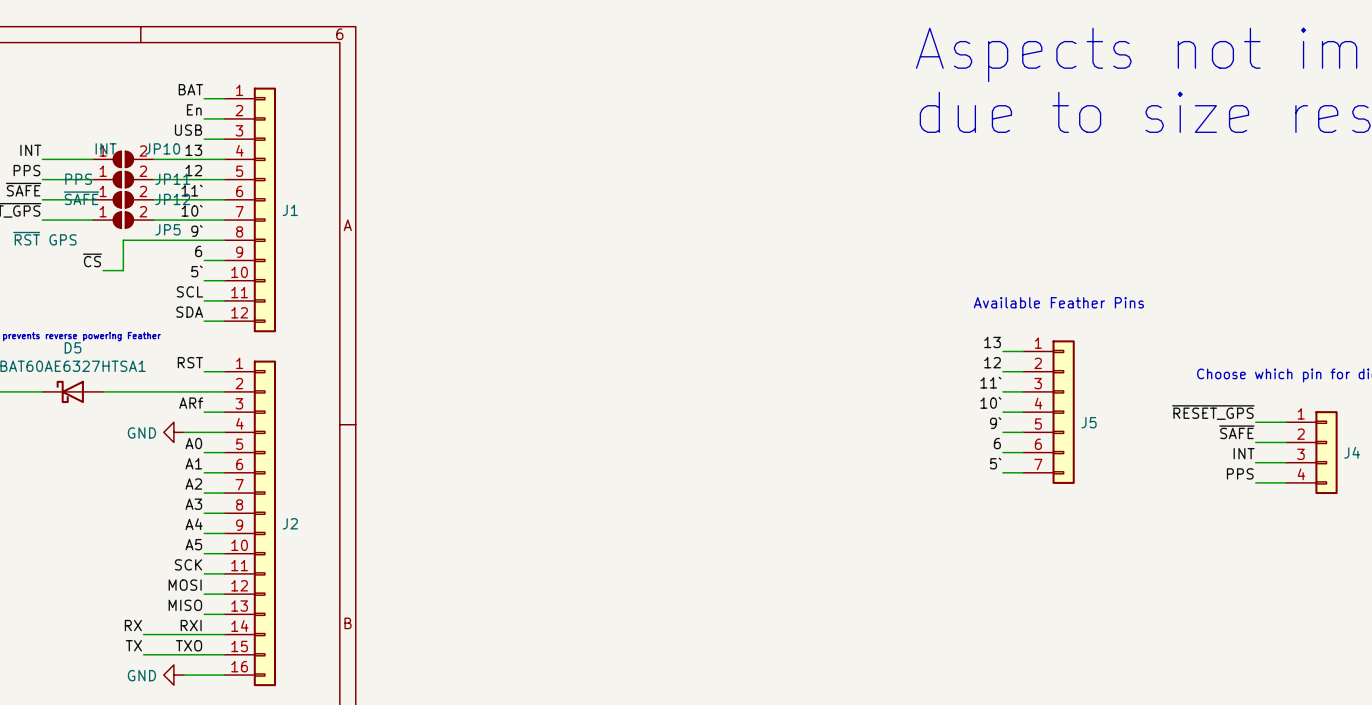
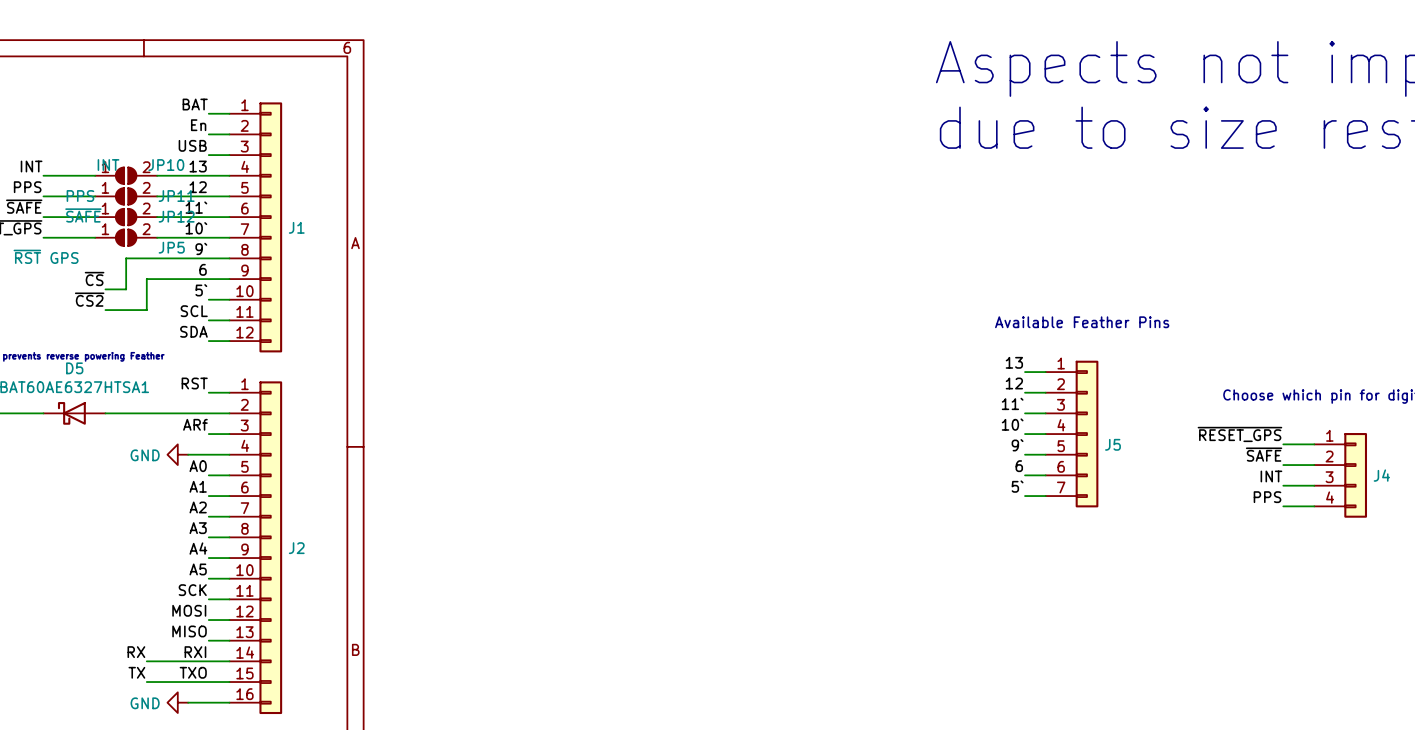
wire: none -> (208, 279) (146, 279) (146, 310) (105, 310)
label: none -> ~{CS2} (89, 299)

